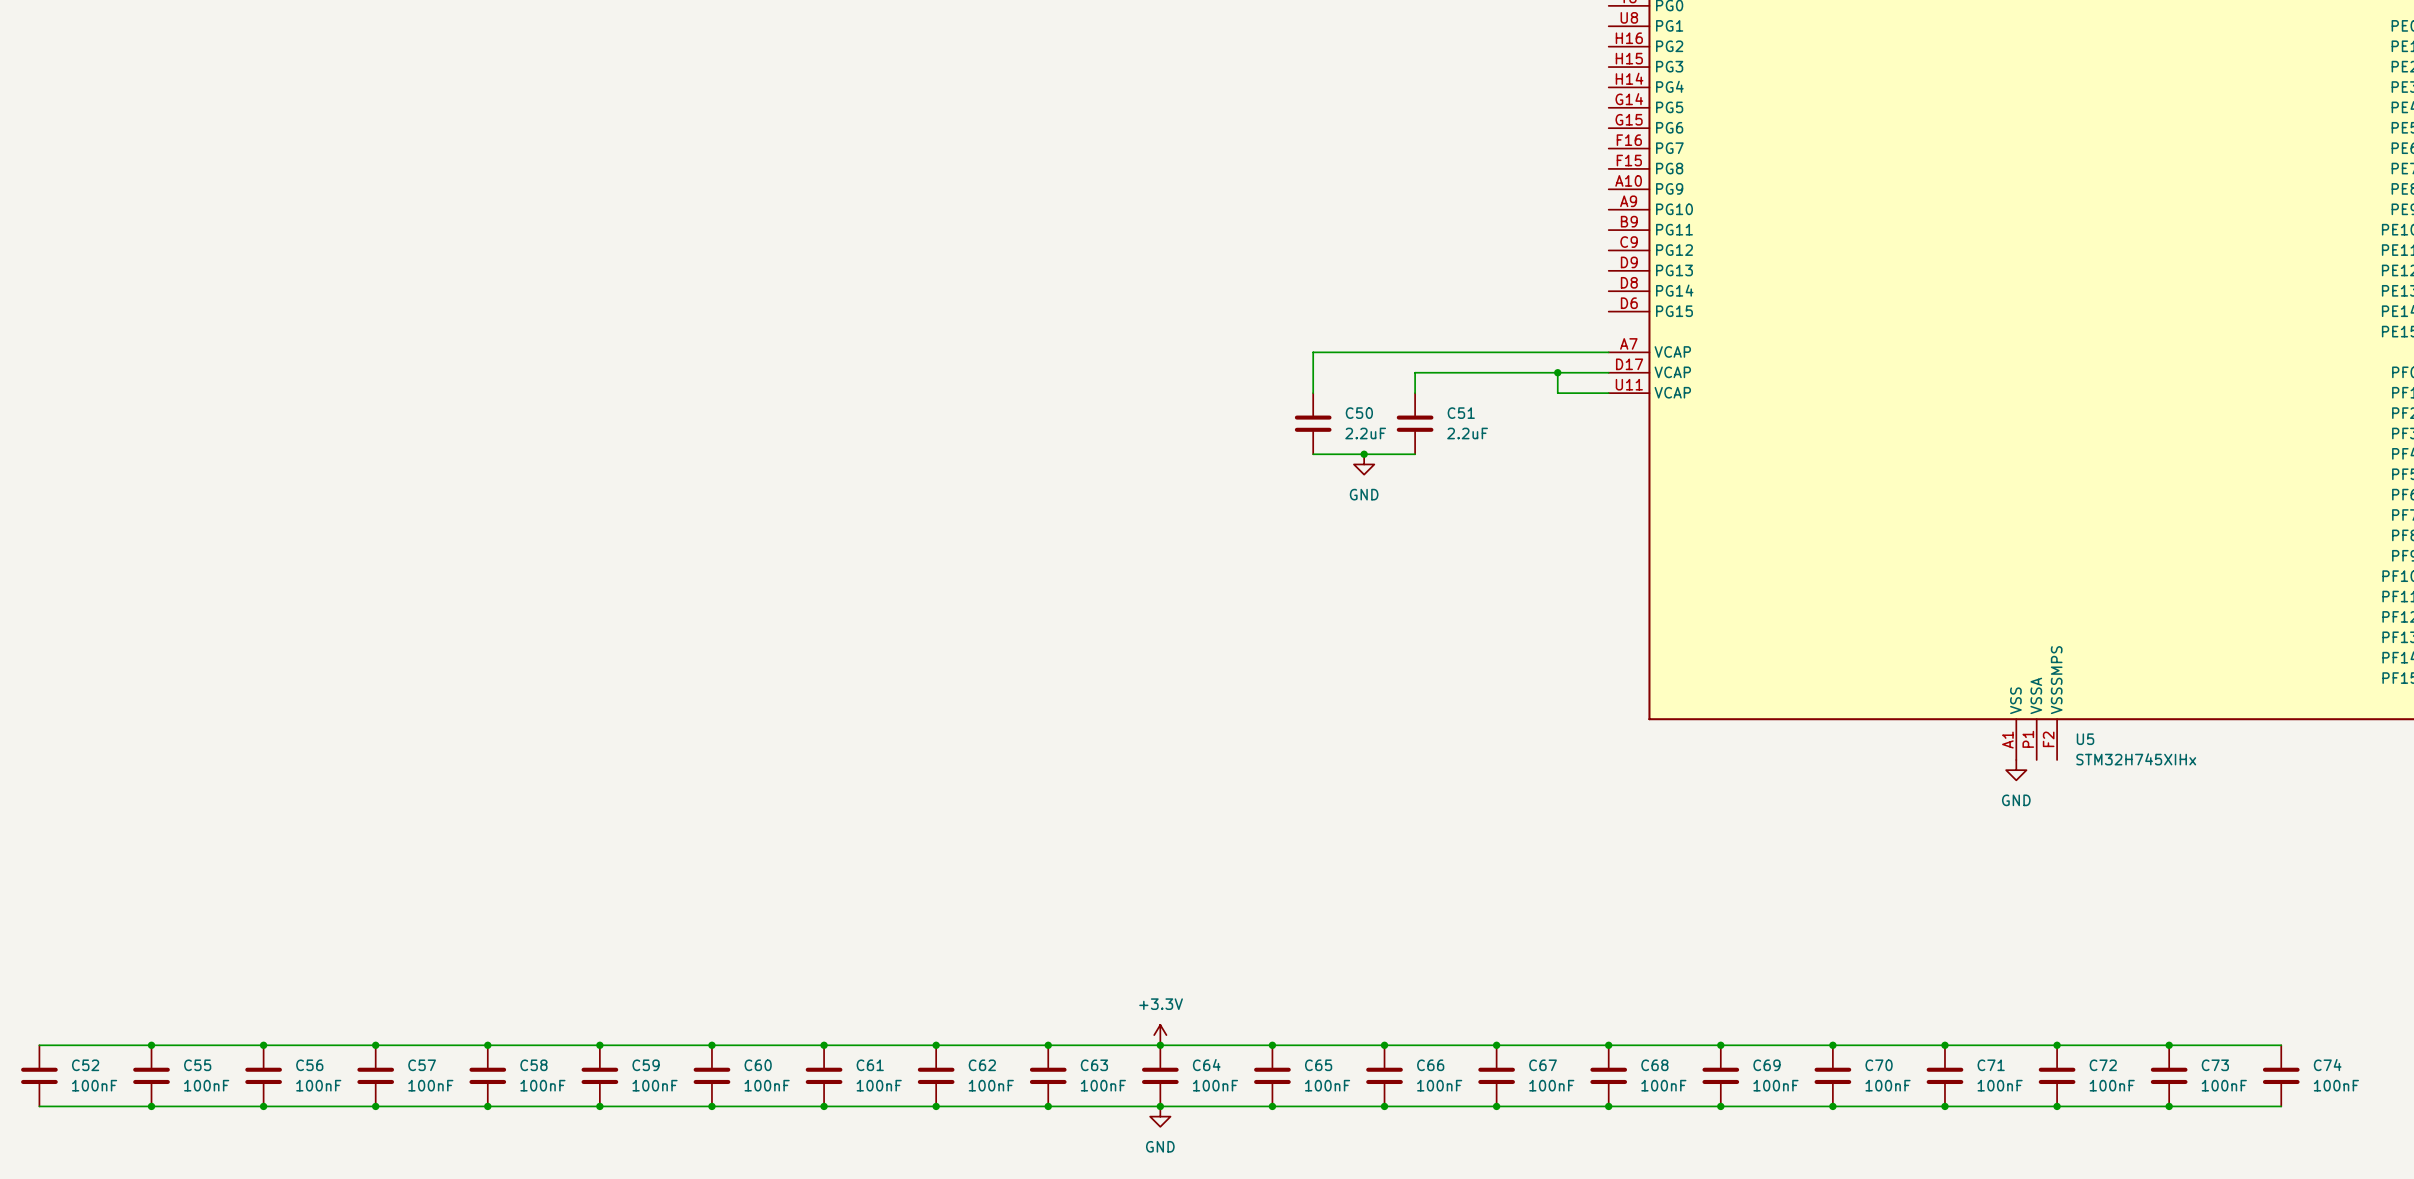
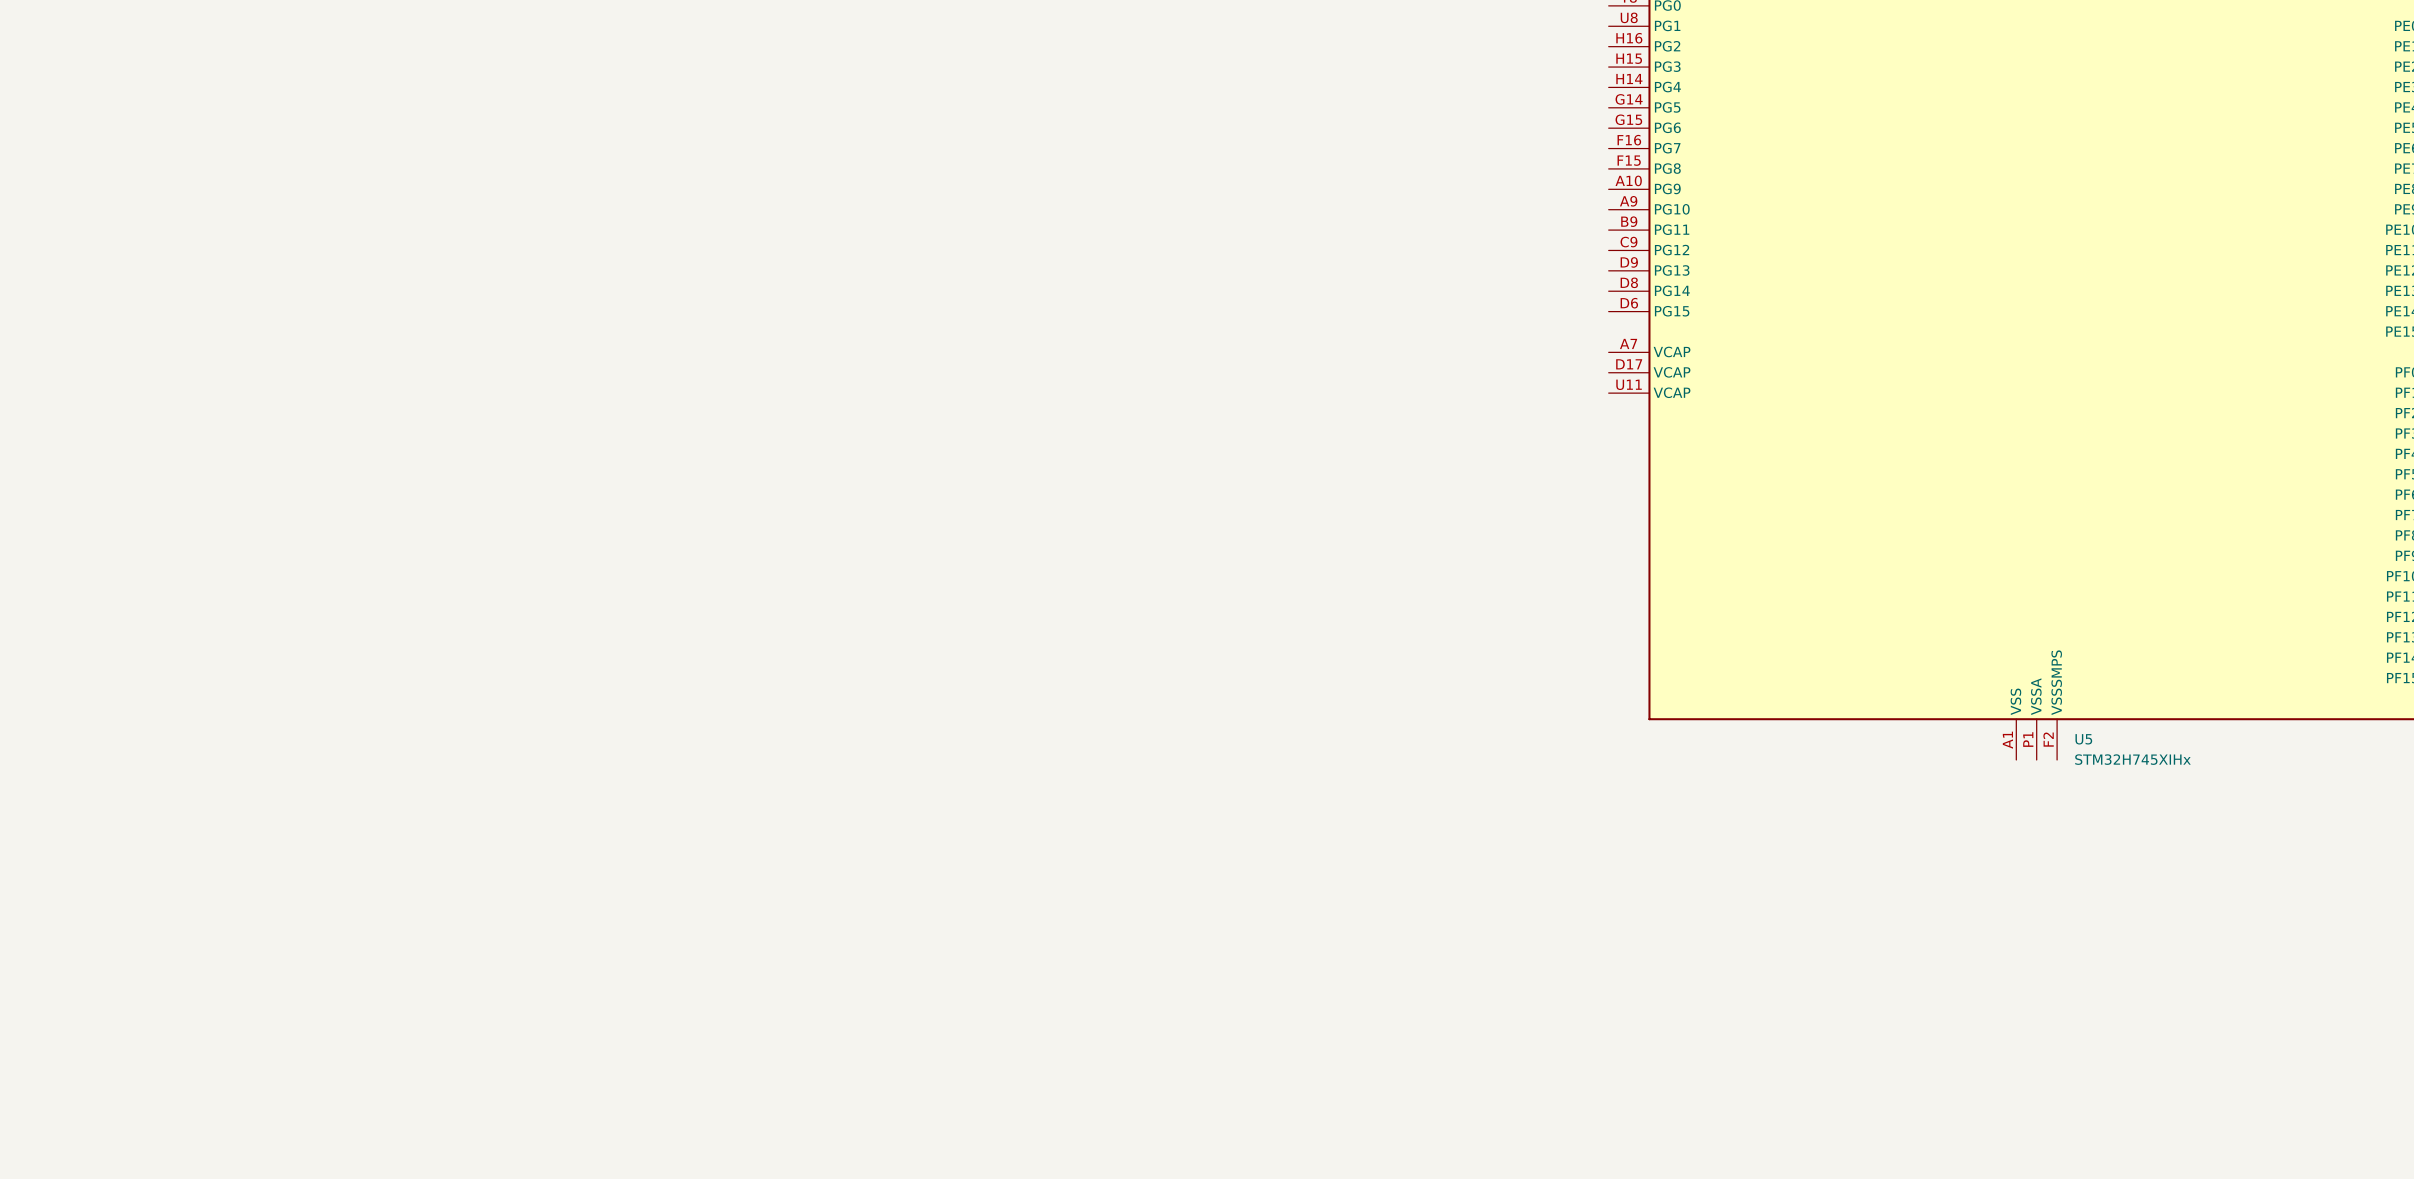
wire: (1608, 352) (1313, 352) (1313, 393) -> none
wire: (1557, 372) (1557, 393) (1608, 393) -> none
junction: (1557, 372) -> none
wire: (1608, 372) (1415, 372) (1415, 393) -> none
C50: 2.2uF (1313, 423) -> none
C51: 2.2uF (1415, 423) -> none
wire: (1313, 454) (1415, 454) -> none
junction: (1364, 454) -> none
power symbol: GND (1364, 464) -> none
power symbol: GND (2016, 770) -> none
power symbol: +3.3V (1160, 1035) -> none
wire: (39, 1045) (2281, 1045) -> none
junction: (151, 1045) -> none
junction: (263, 1045) -> none
junction: (375, 1045) -> none
junction: (487, 1045) -> none
junction: (599, 1045) -> none
junction: (711, 1045) -> none
junction: (824, 1045) -> none
junction: (936, 1045) -> none
junction: (1048, 1045) -> none
junction: (1160, 1045) -> none
junction: (1272, 1045) -> none
junction: (1384, 1045) -> none
junction: (1496, 1045) -> none
junction: (1608, 1045) -> none
junction: (1720, 1045) -> none
junction: (1832, 1045) -> none
junction: (1944, 1045) -> none
junction: (2057, 1045) -> none
junction: (2169, 1045) -> none
C52: 100nF (39, 1075) -> none
C55: 100nF (151, 1075) -> none
C56: 100nF (263, 1075) -> none
C57: 100nF (375, 1075) -> none
C58: 100nF (487, 1075) -> none
C59: 100nF (599, 1075) -> none
C60: 100nF (711, 1075) -> none
C61: 100nF (824, 1075) -> none
C62: 100nF (936, 1075) -> none
C63: 100nF (1048, 1075) -> none
C64: 100nF (1160, 1075) -> none
C65: 100nF (1272, 1075) -> none
C66: 100nF (1384, 1075) -> none
C67: 100nF (1496, 1075) -> none
C68: 100nF (1608, 1075) -> none
C69: 100nF (1720, 1075) -> none
C70: 100nF (1832, 1075) -> none
C71: 100nF (1944, 1075) -> none
C72: 100nF (2057, 1075) -> none
C73: 100nF (2169, 1075) -> none
C74: 100nF (2281, 1075) -> none
wire: (39, 1106) (2281, 1106) -> none
junction: (151, 1106) -> none
junction: (263, 1106) -> none
junction: (375, 1106) -> none
junction: (487, 1106) -> none
junction: (599, 1106) -> none
junction: (711, 1106) -> none
junction: (824, 1106) -> none
junction: (936, 1106) -> none
junction: (1048, 1106) -> none
junction: (1160, 1106) -> none
junction: (1272, 1106) -> none
junction: (1384, 1106) -> none
junction: (1496, 1106) -> none
junction: (1608, 1106) -> none
junction: (1720, 1106) -> none
junction: (1832, 1106) -> none
junction: (1944, 1106) -> none
junction: (2057, 1106) -> none
junction: (2169, 1106) -> none
power symbol: GND (1160, 1116) -> none

